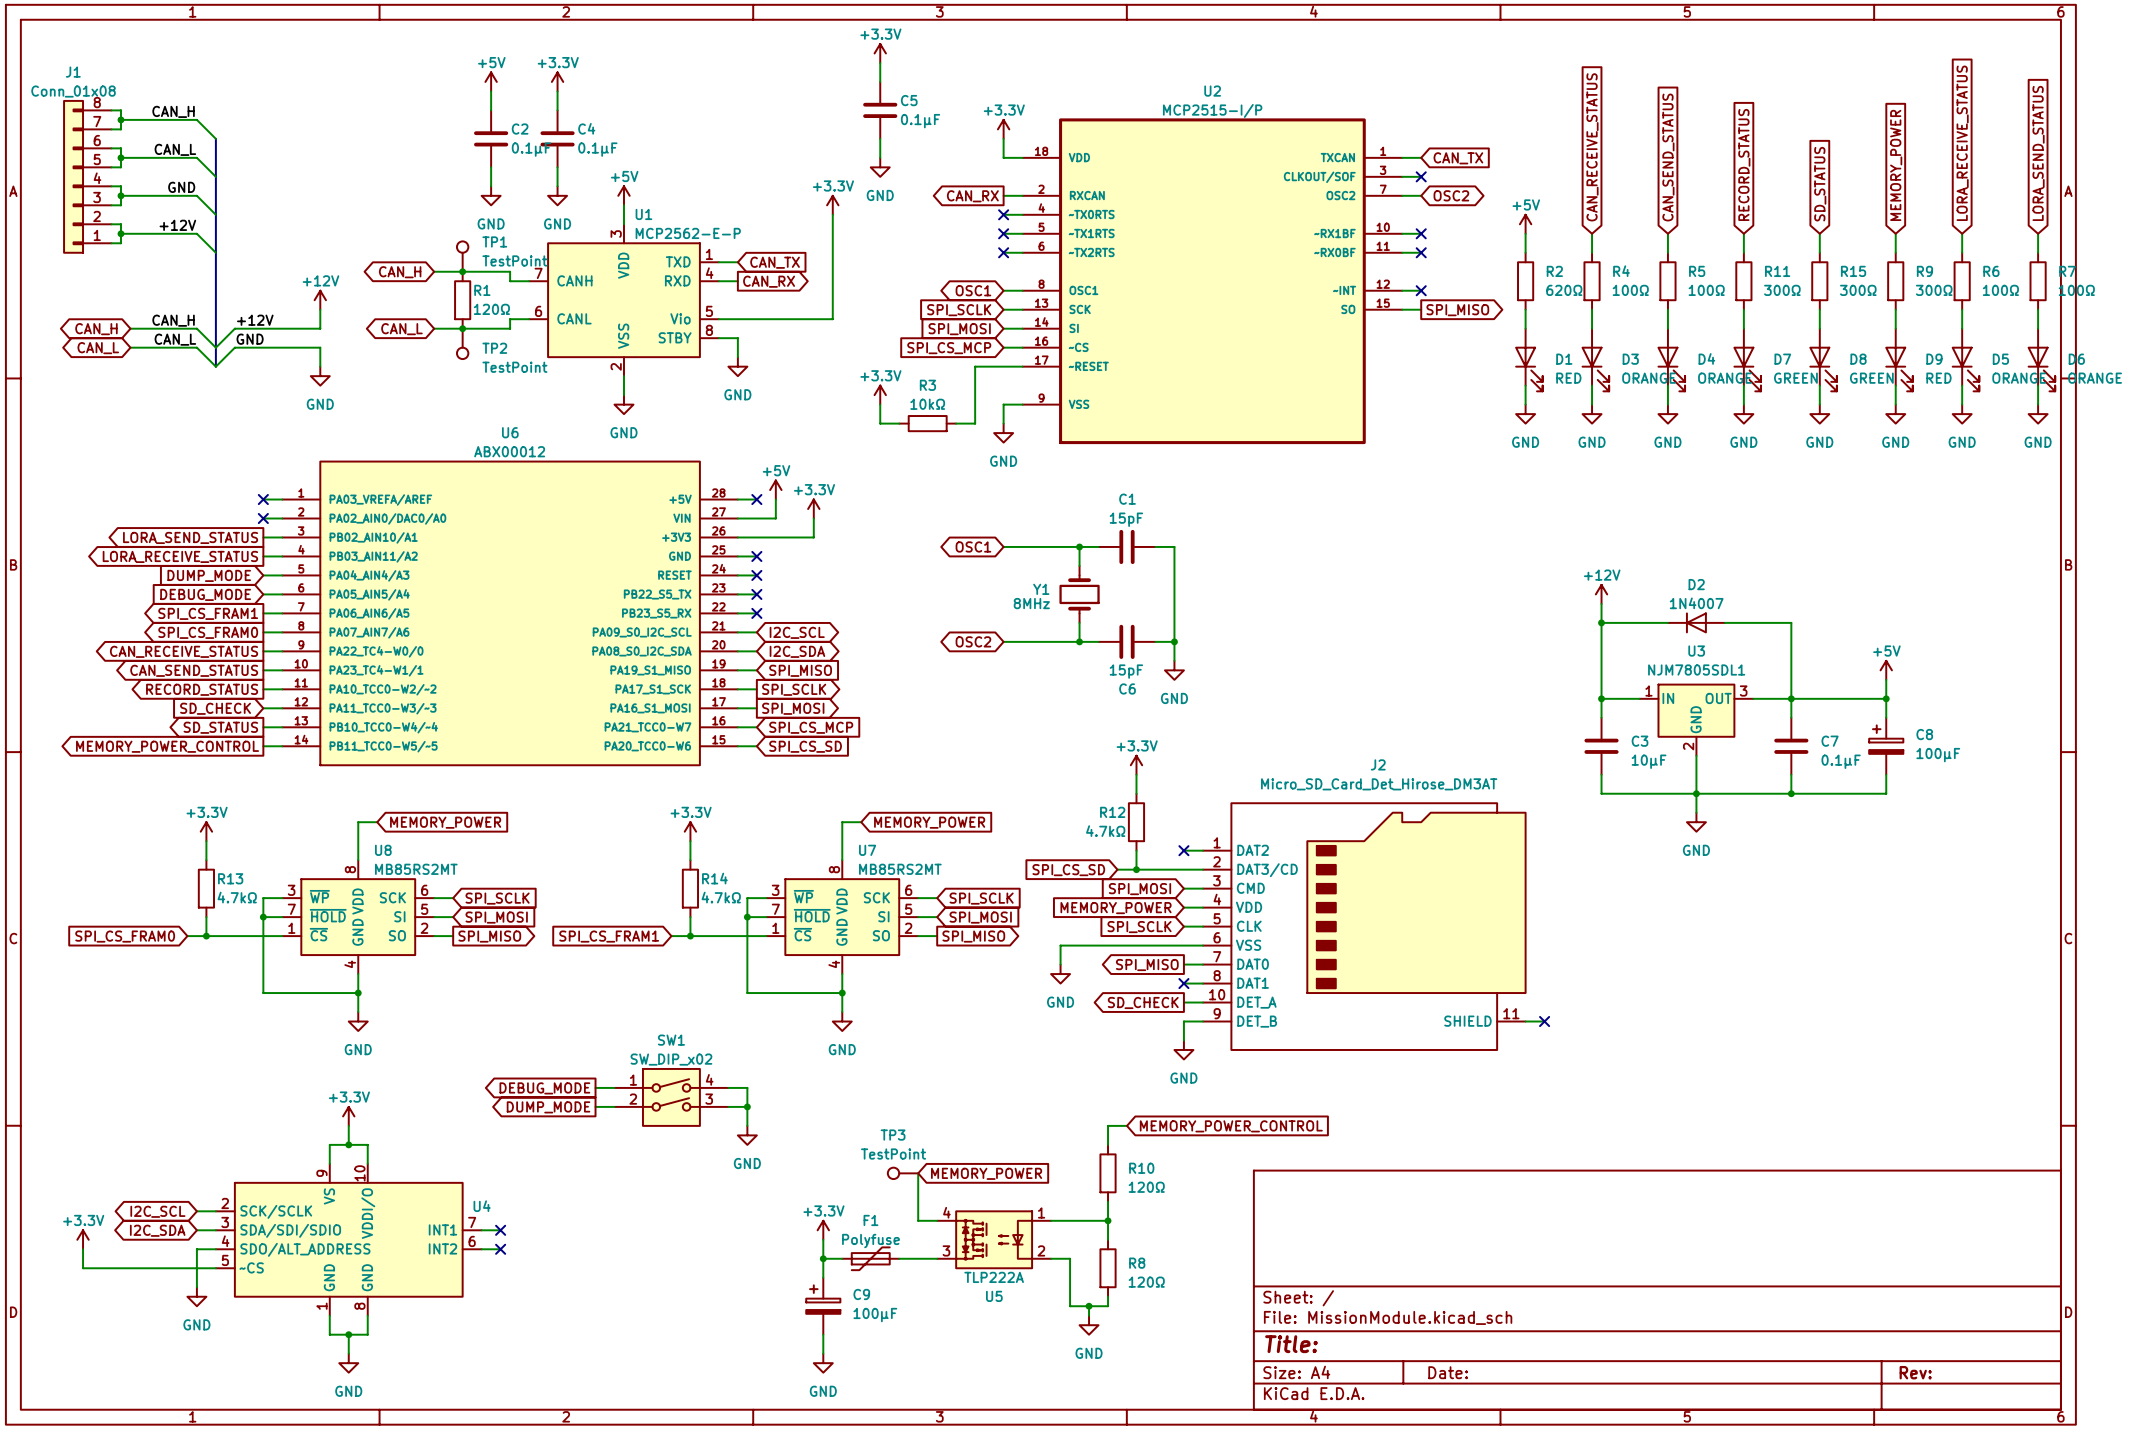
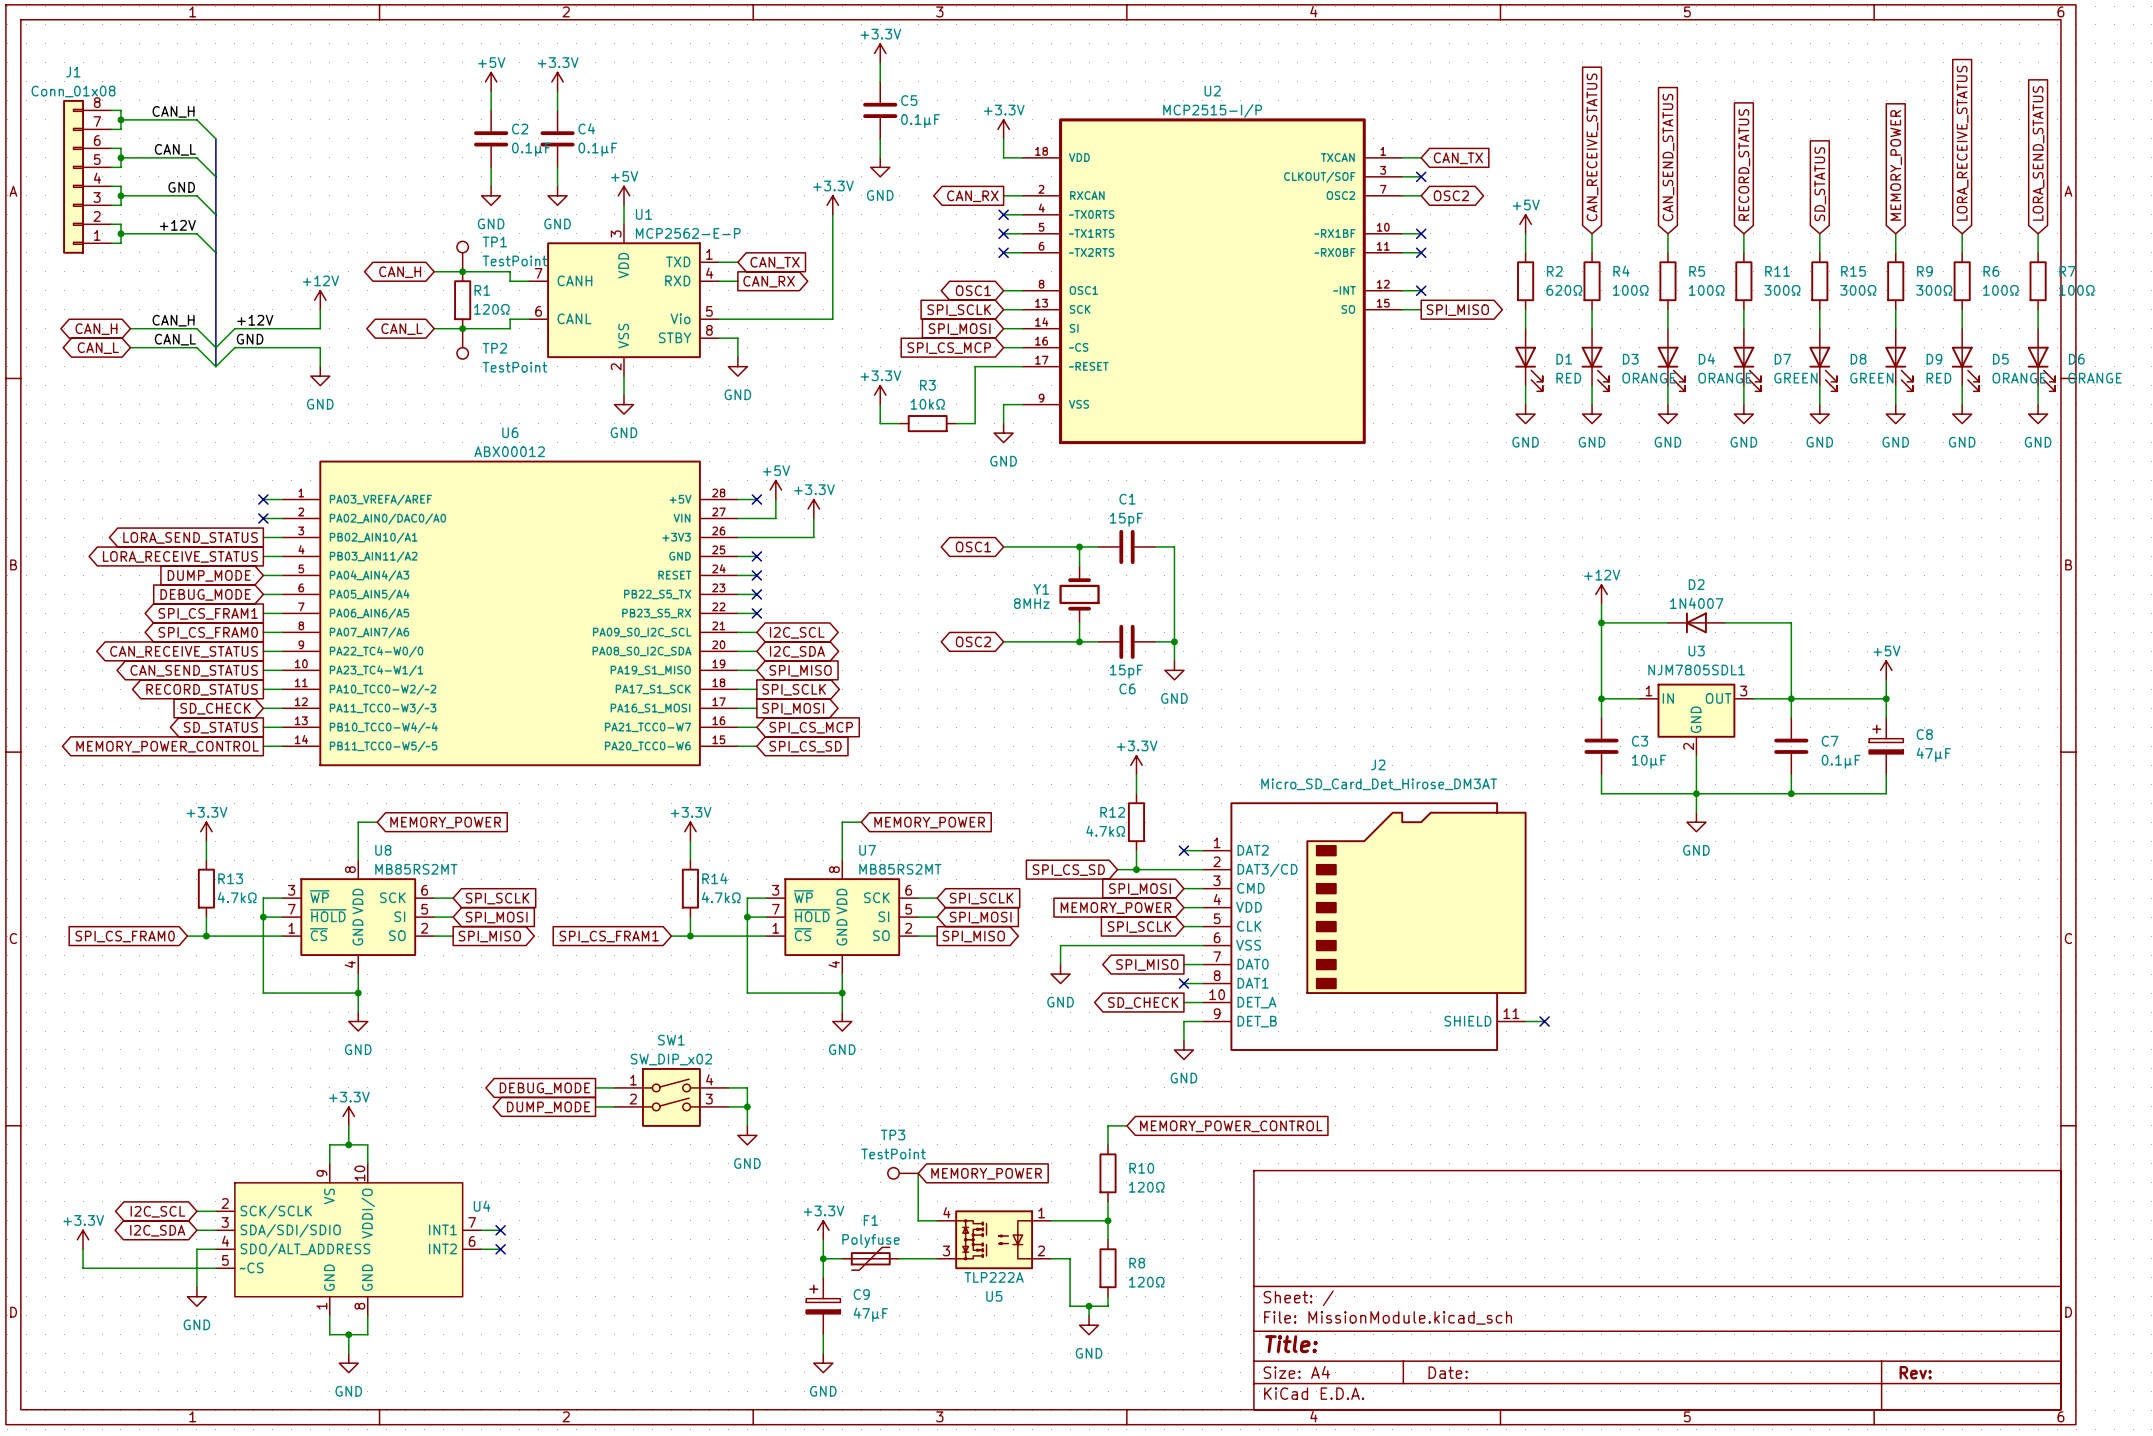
C8 value: 100μF (1938, 755) -> 47μF (1933, 754)
C9 value: 100μF (875, 1315) -> 47μF (870, 1314)

